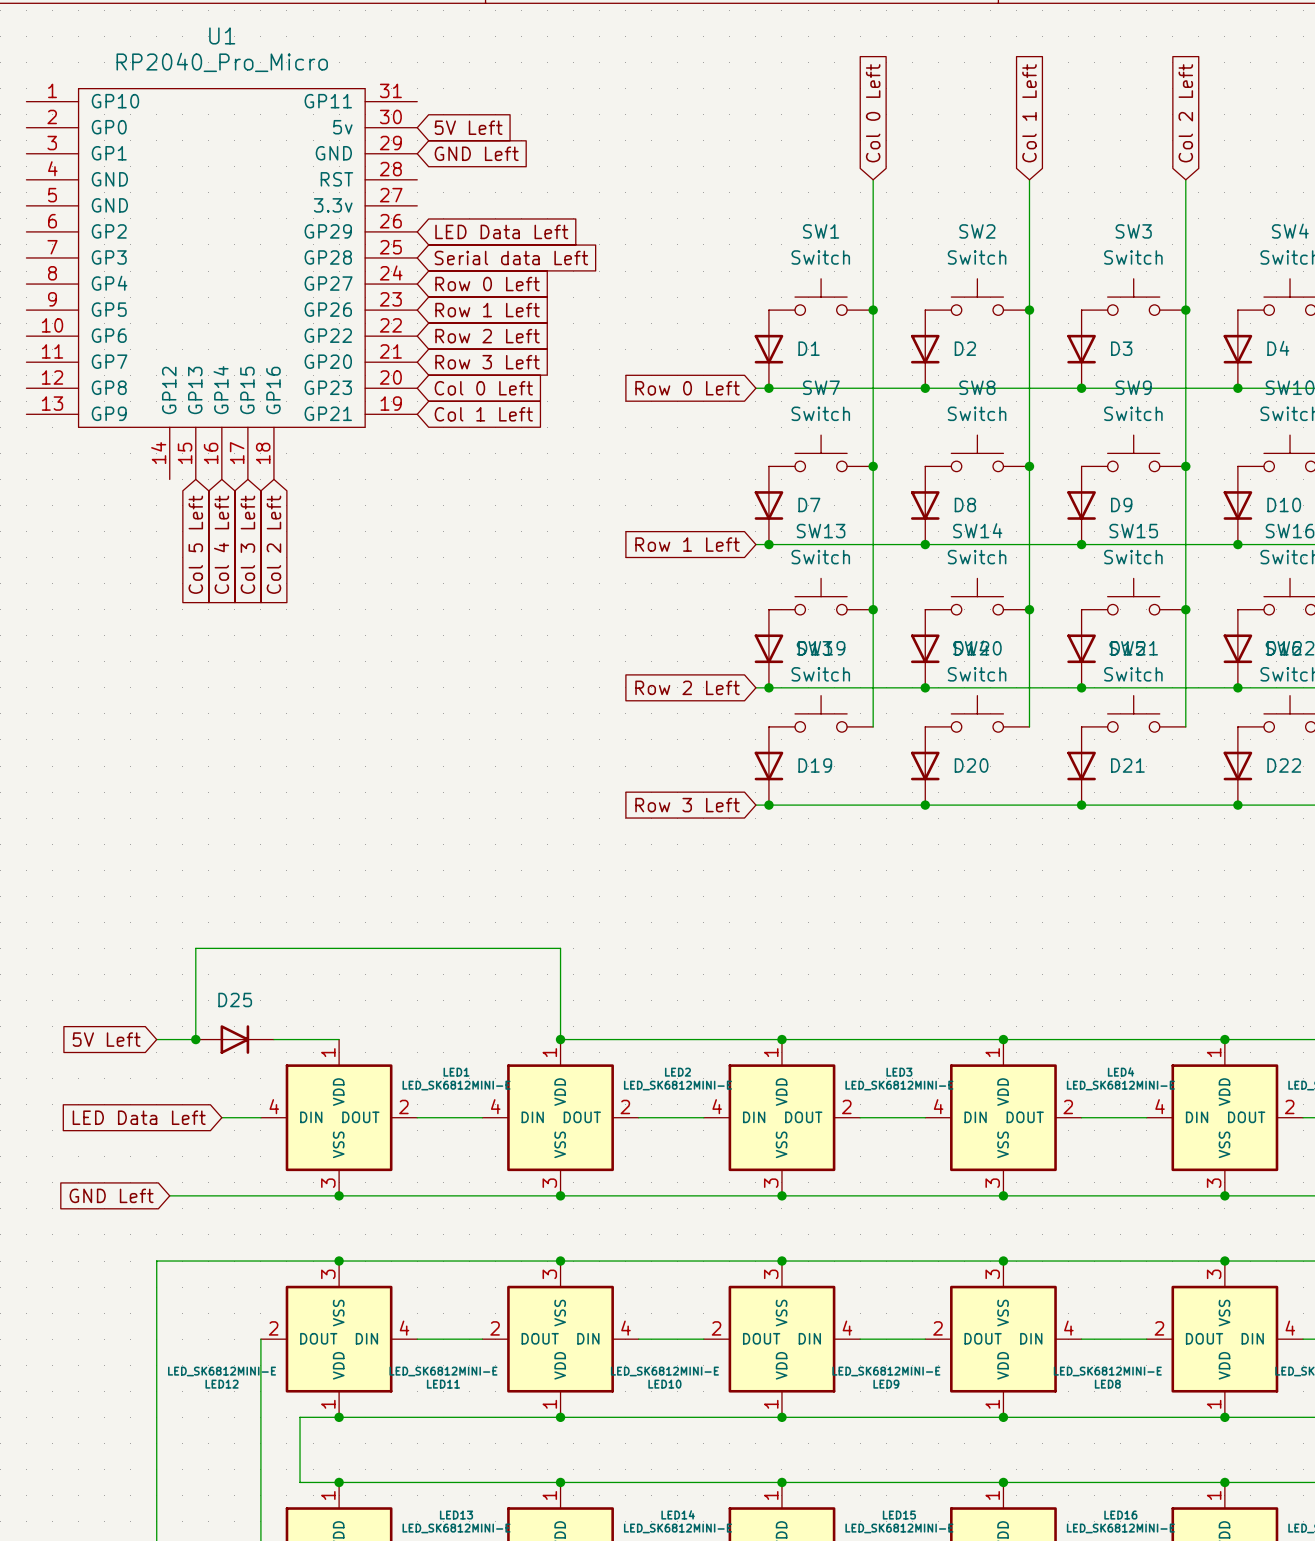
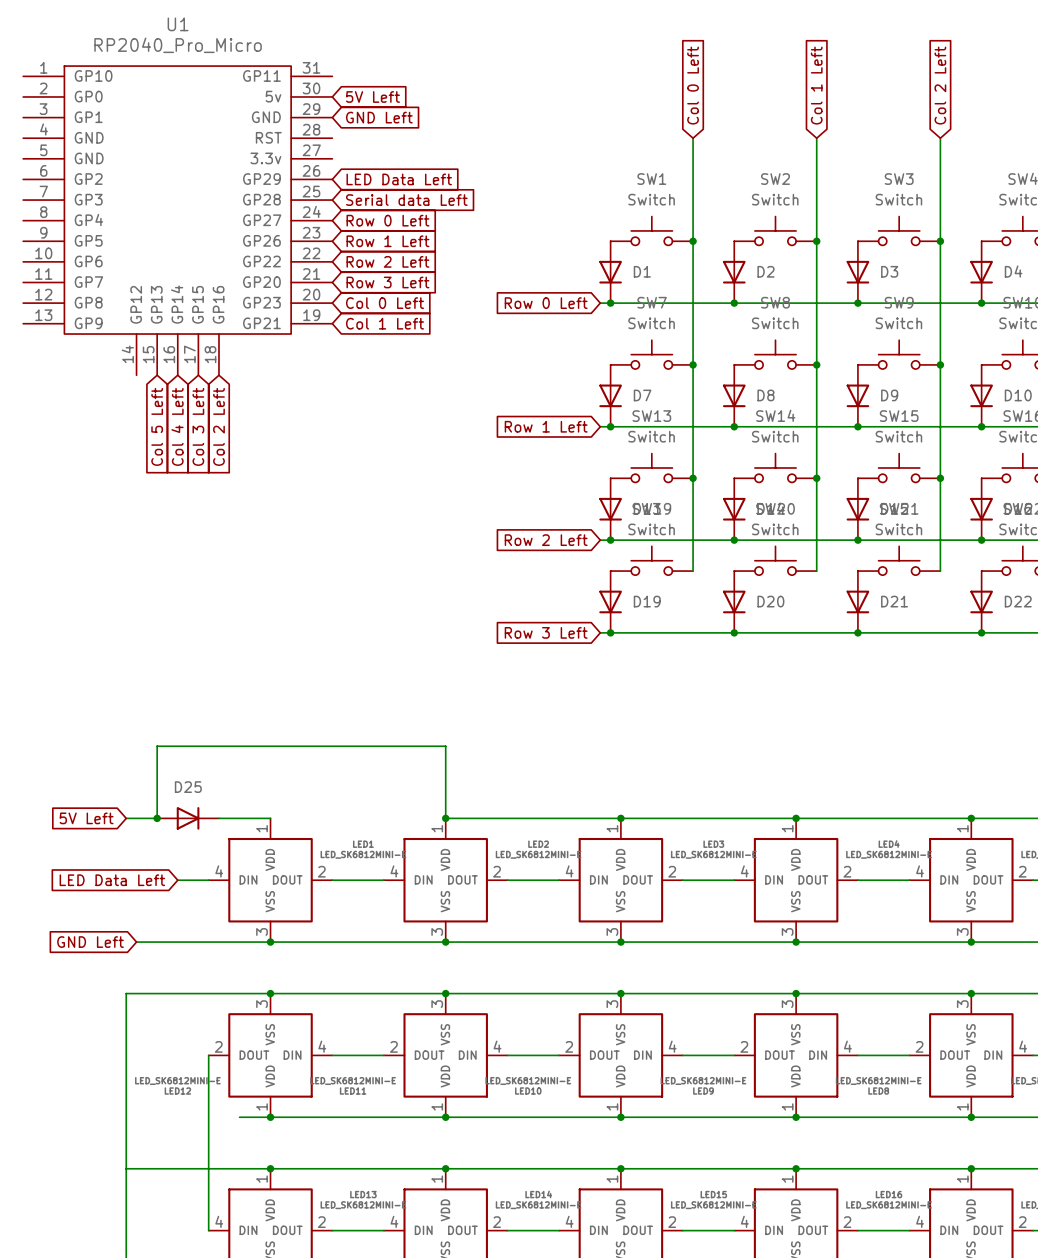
wire: (300, 1417) (300, 1482) -> (126, 1168) (239, 1168)

